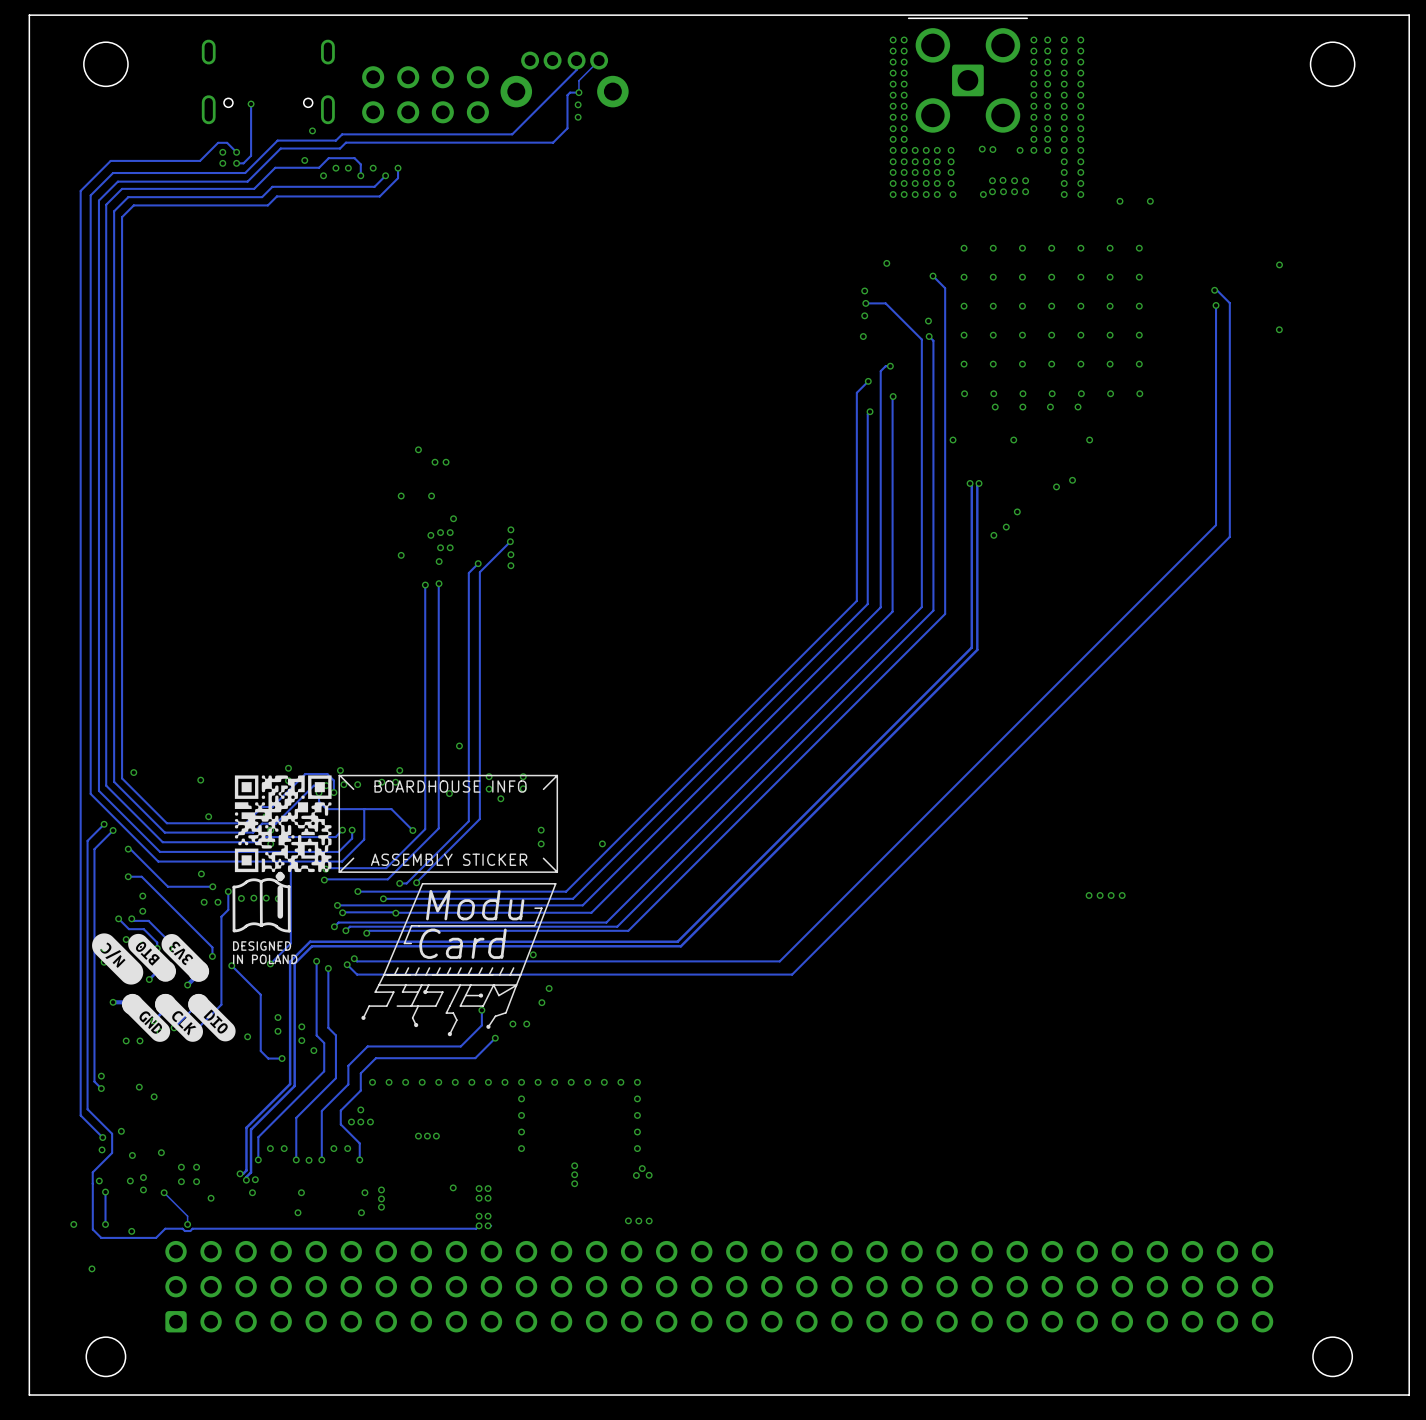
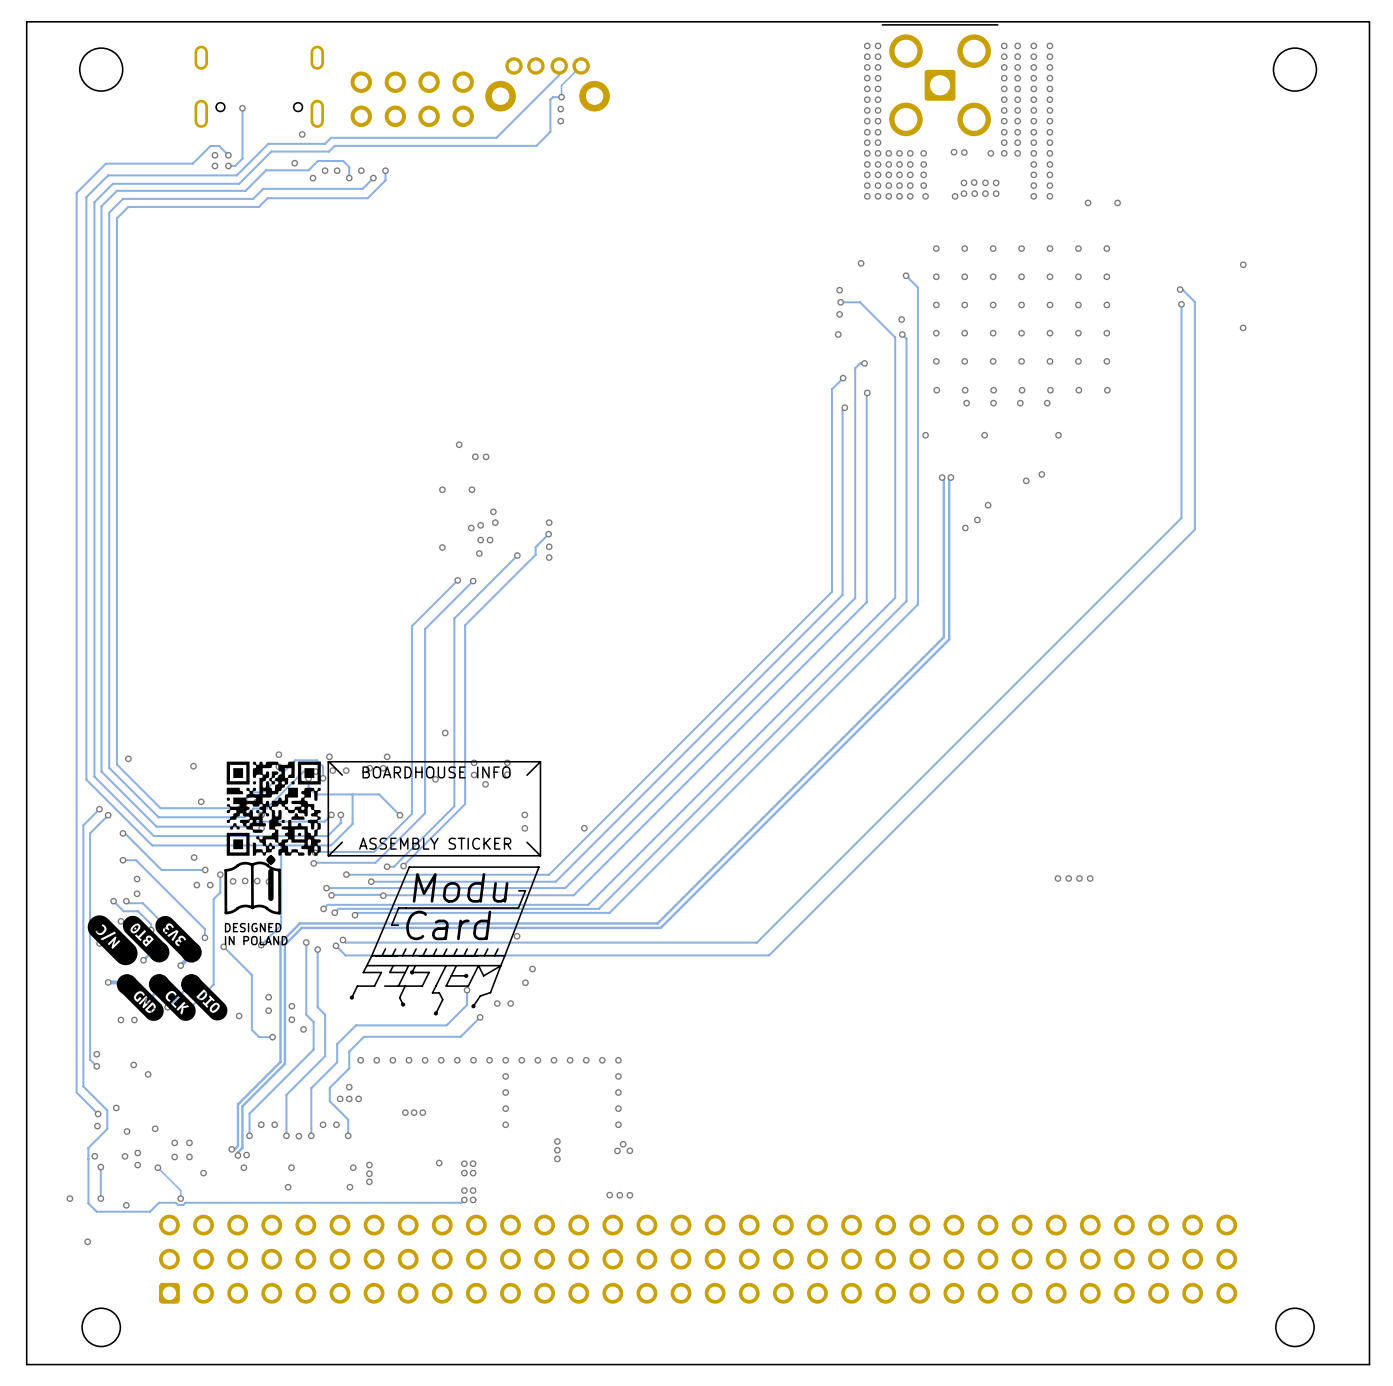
via: (418, 449) -> none
via: none -> (459, 444)
via: (435, 462) -> none
via: (446, 462) -> none
via: none -> (475, 456)
via: none -> (486, 456)
via: (401, 496) -> none
via: (431, 496) -> none
via: none -> (442, 489)
via: none -> (471, 489)
via: (453, 518) -> none
via: none -> (493, 511)
via: none -> (549, 522)
via: (440, 532) -> none
via: (450, 532) -> none
via: none -> (480, 525)
via: (430, 535) -> none
via: none -> (471, 528)
track: (510, 541) (479, 572) (479, 635) -> (548, 534) (535, 547) (535, 554) (465, 625)
via: (510, 541) -> none
via: none -> (548, 534)
via: (440, 547) -> none
via: (450, 547) -> none
via: none -> (480, 540)
via: none -> (490, 540)
via: (510, 554) -> none
via: none -> (549, 546)
via: (401, 555) -> none
via: none -> (442, 547)
via: (439, 561) -> none
via: none -> (479, 553)
track: (478, 563) (468, 573) (468, 628) -> (517, 555) (454, 618)
via: (478, 563) -> none
via: none -> (517, 555)
via: (510, 565) -> none
via: none -> (549, 557)
track: (439, 583) (438, 639) -> (473, 581) (425, 629)
via: (439, 583) -> none
track: (425, 585) (425, 636) -> (457, 580) (411, 626)
via: (425, 585) -> none
via: none -> (457, 580)
via: none -> (473, 581)

